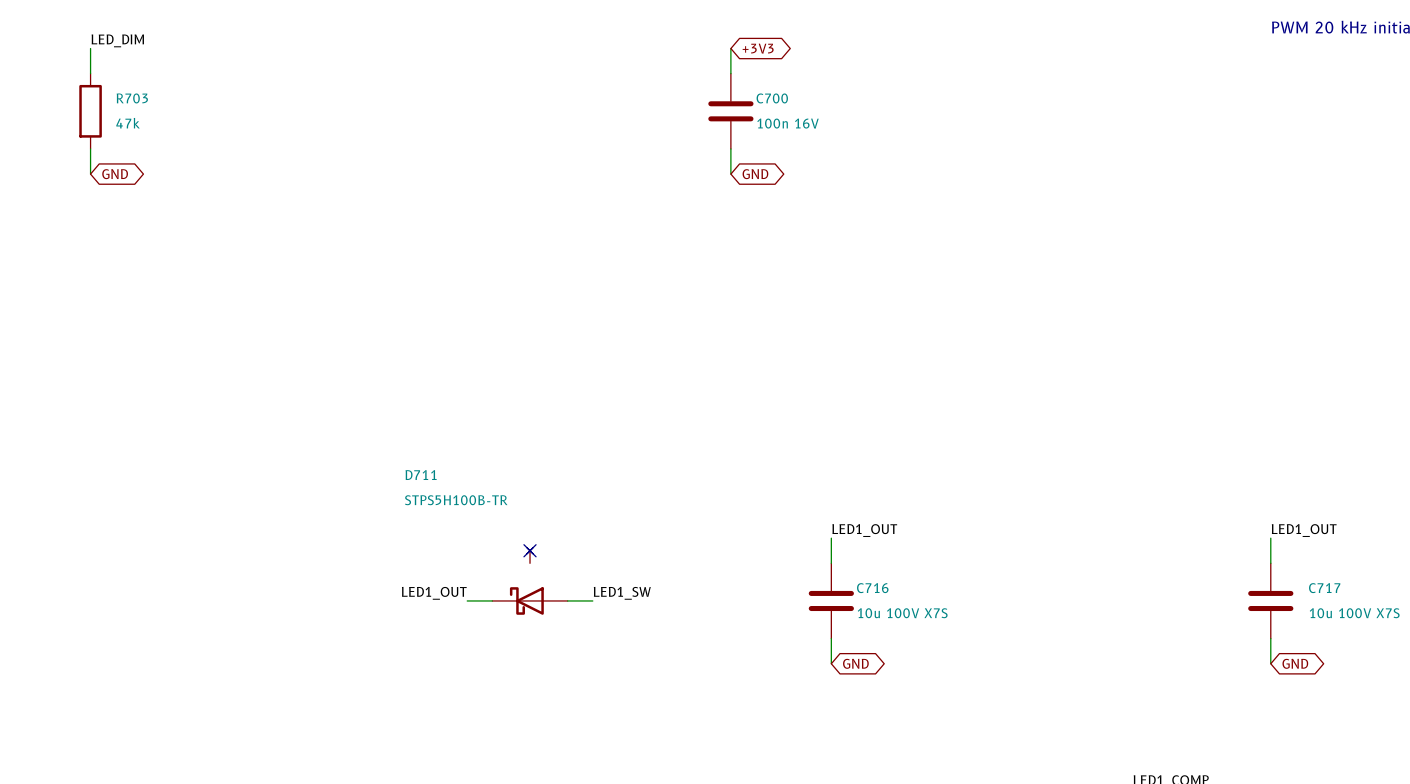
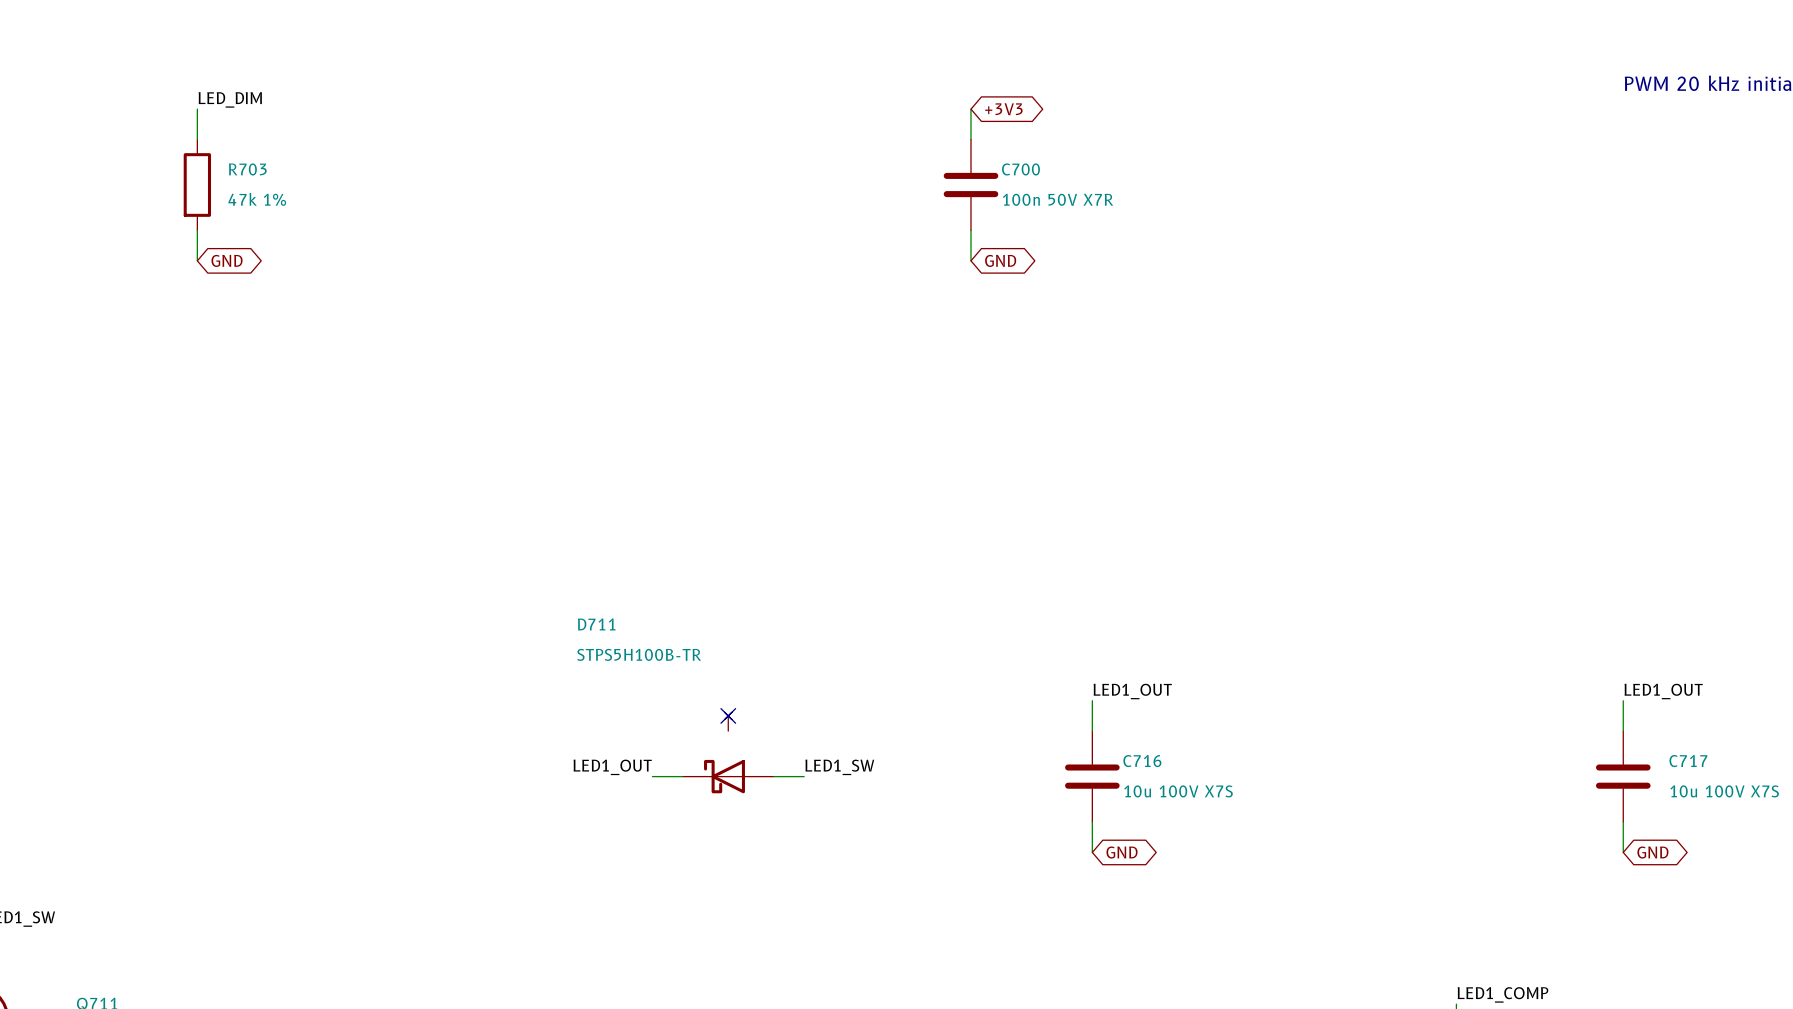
R703 value: 47k (128, 123) -> 47k 1% (257, 199)
C700 value: 100n 16V (788, 123) -> 100n 50V X7R (1058, 199)

